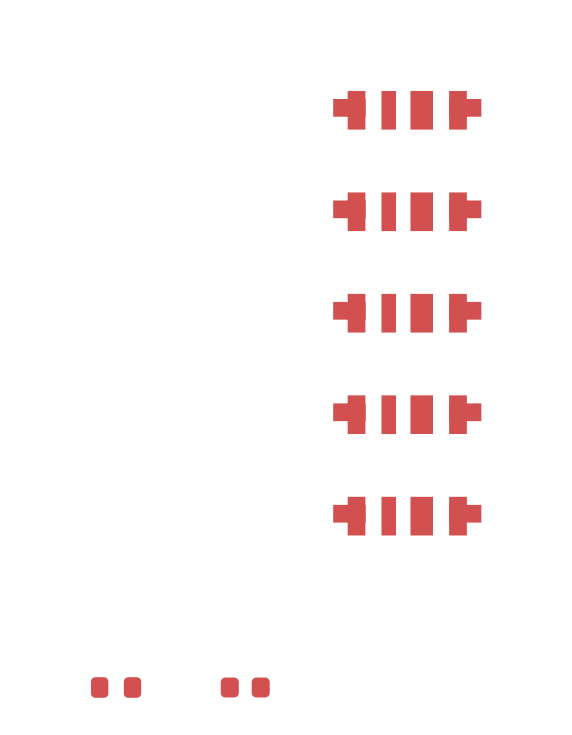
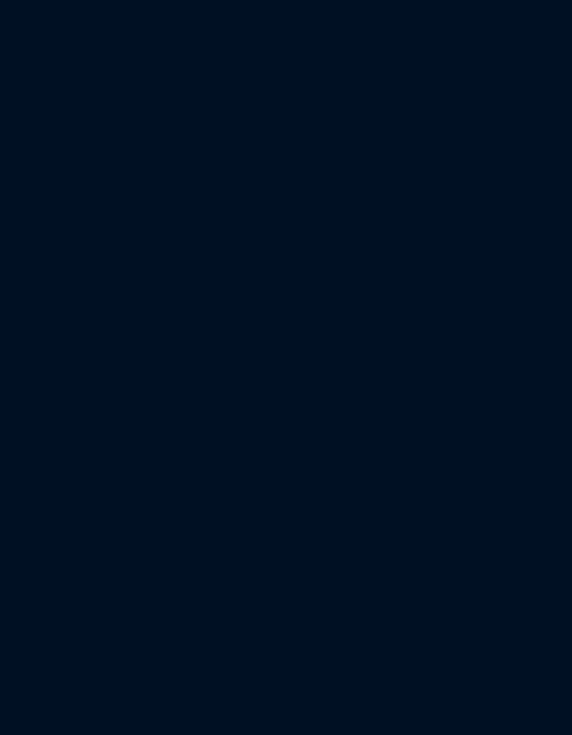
part: (407, 110) -> none
part: (407, 211) -> none
part: (407, 313) -> none
part: (407, 414) -> none
part: (407, 516) -> none
part: (116, 687) -> none
part: (245, 687) -> none

